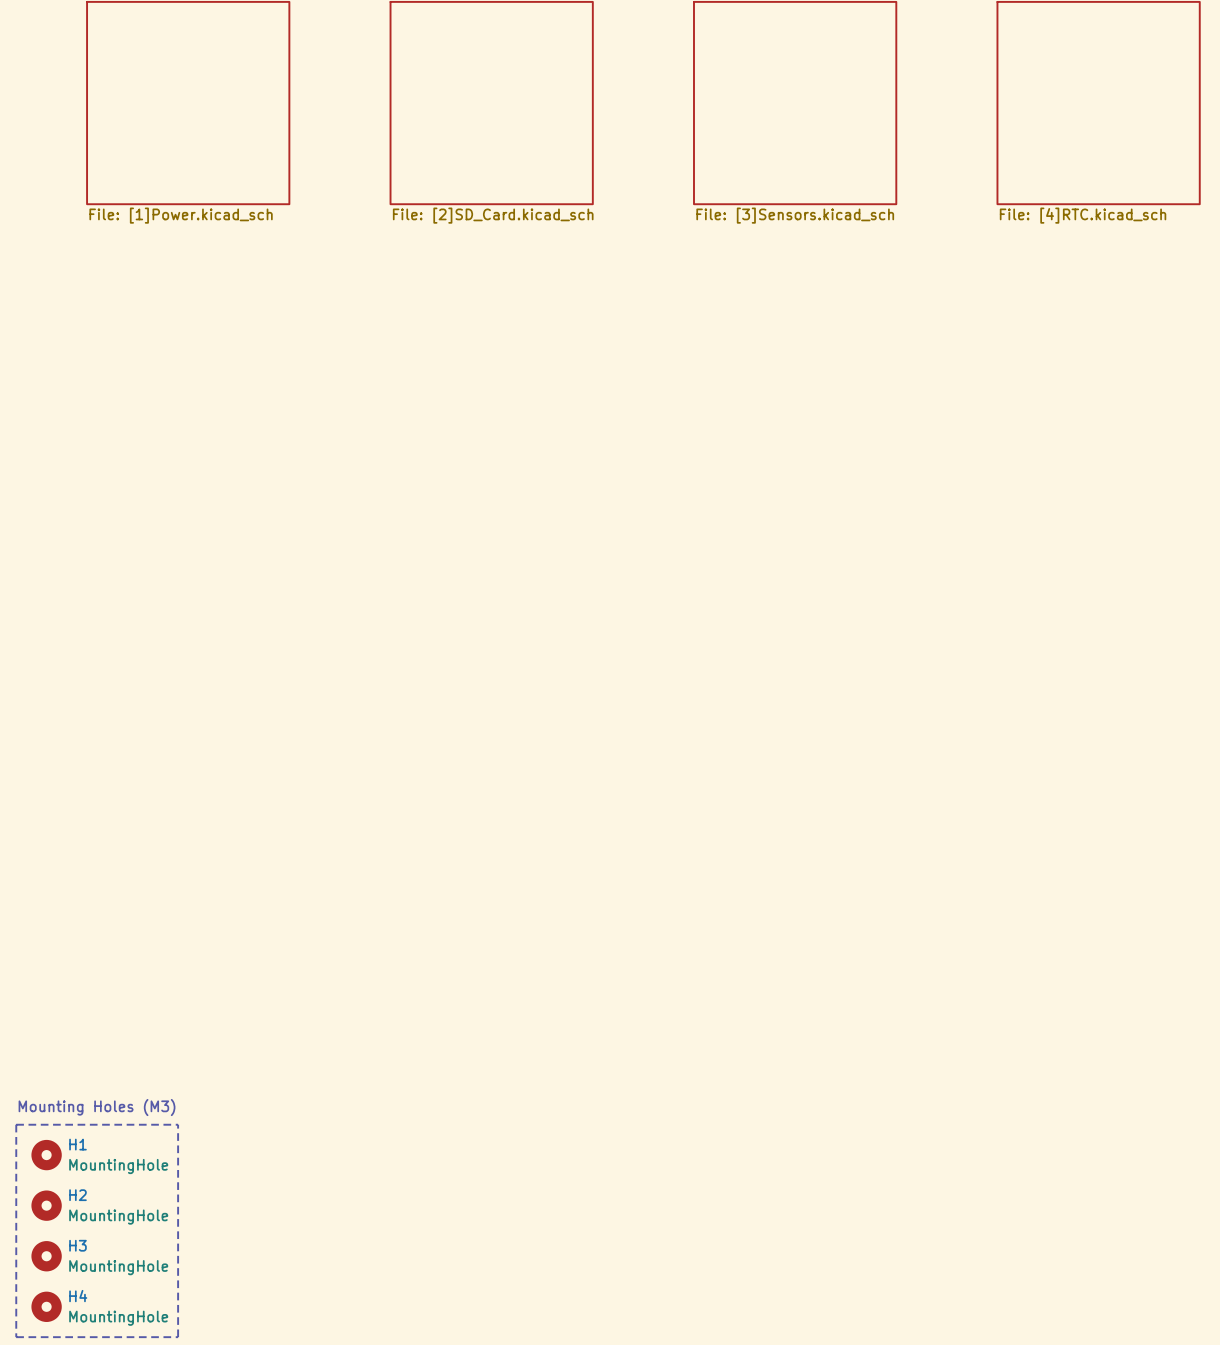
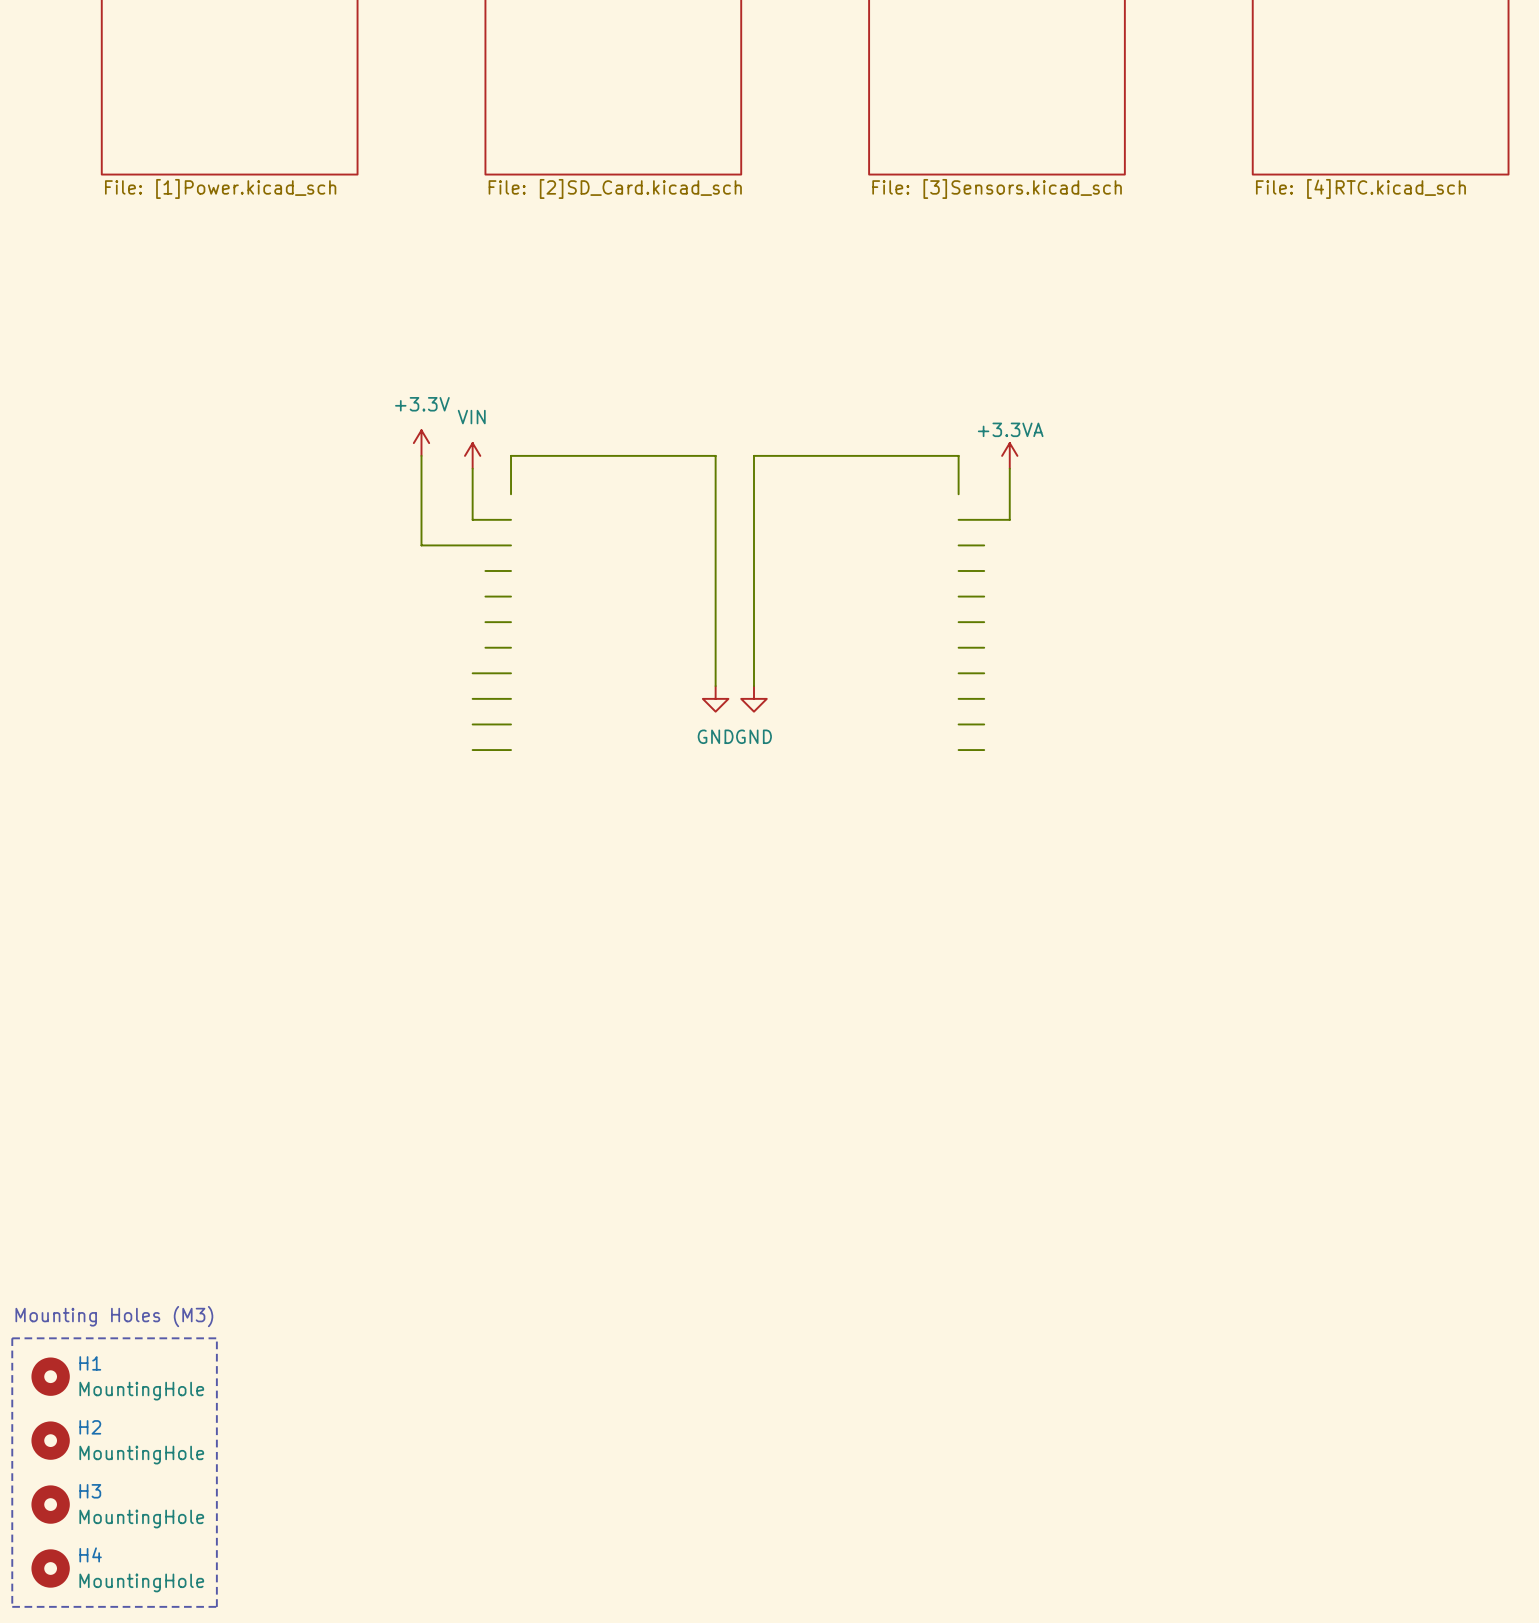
power symbol: none -> +3.3V (421, 443)
wire: none -> (421, 455) (421, 545) (511, 545)
power symbol: none -> VIN (472, 455)
power symbol: none -> +3.3VA (1009, 455)
wire: none -> (472, 468) (472, 519) (511, 519)
wire: none -> (1009, 468) (1009, 519) (958, 519)
wire: none -> (511, 494) (511, 455) (715, 455) (715, 686)
wire: none -> (958, 494) (958, 455) (753, 455) (753, 686)
wire: none -> (958, 545) (984, 545)
wire: none -> (485, 570) (511, 570)
wire: none -> (958, 570) (984, 570)
wire: none -> (485, 596) (511, 596)
wire: none -> (958, 596) (984, 596)
wire: none -> (485, 622) (511, 622)
wire: none -> (958, 622) (984, 622)
wire: none -> (485, 647) (511, 647)
wire: none -> (958, 647) (984, 647)
wire: none -> (472, 673) (511, 673)
wire: none -> (958, 673) (984, 673)
wire: none -> (472, 698) (511, 698)
power symbol: none -> GND (715, 698)
power symbol: none -> GND (753, 698)
wire: none -> (958, 698) (984, 698)
wire: none -> (472, 724) (511, 724)
wire: none -> (958, 724) (984, 724)
wire: none -> (472, 750) (511, 750)
wire: none -> (958, 750) (984, 750)

